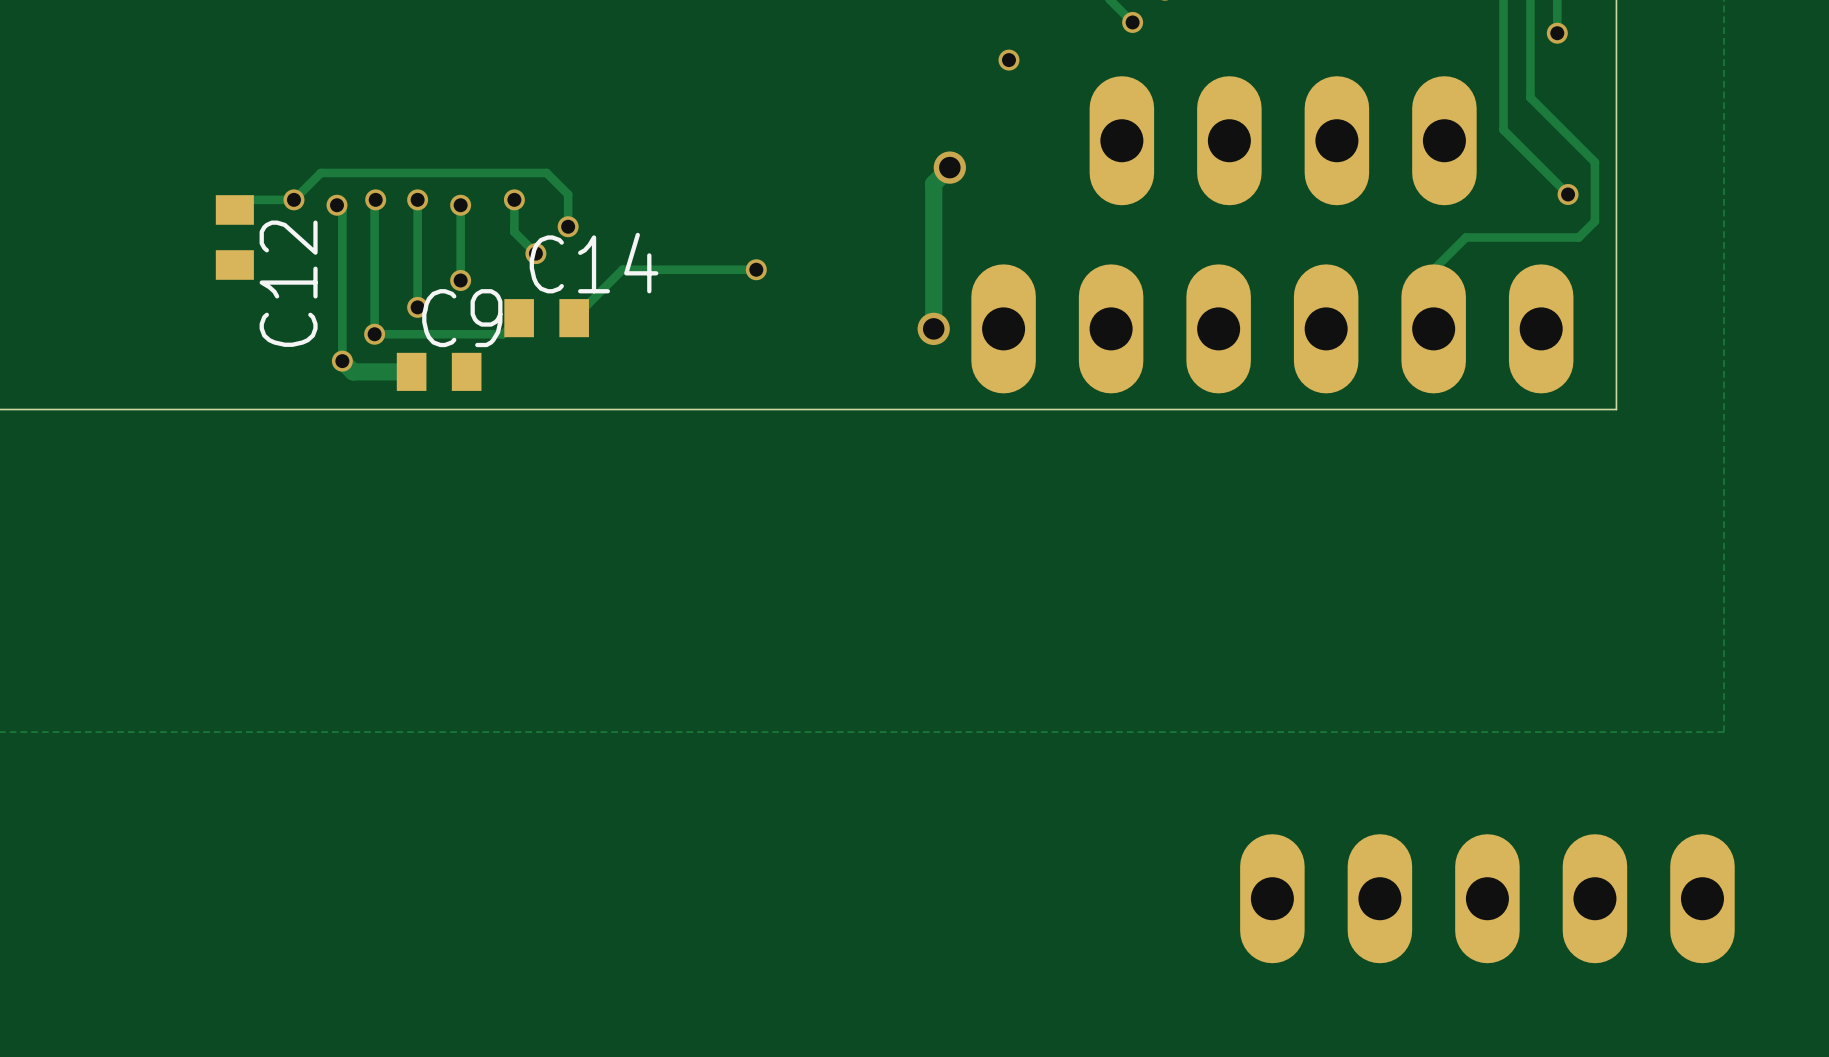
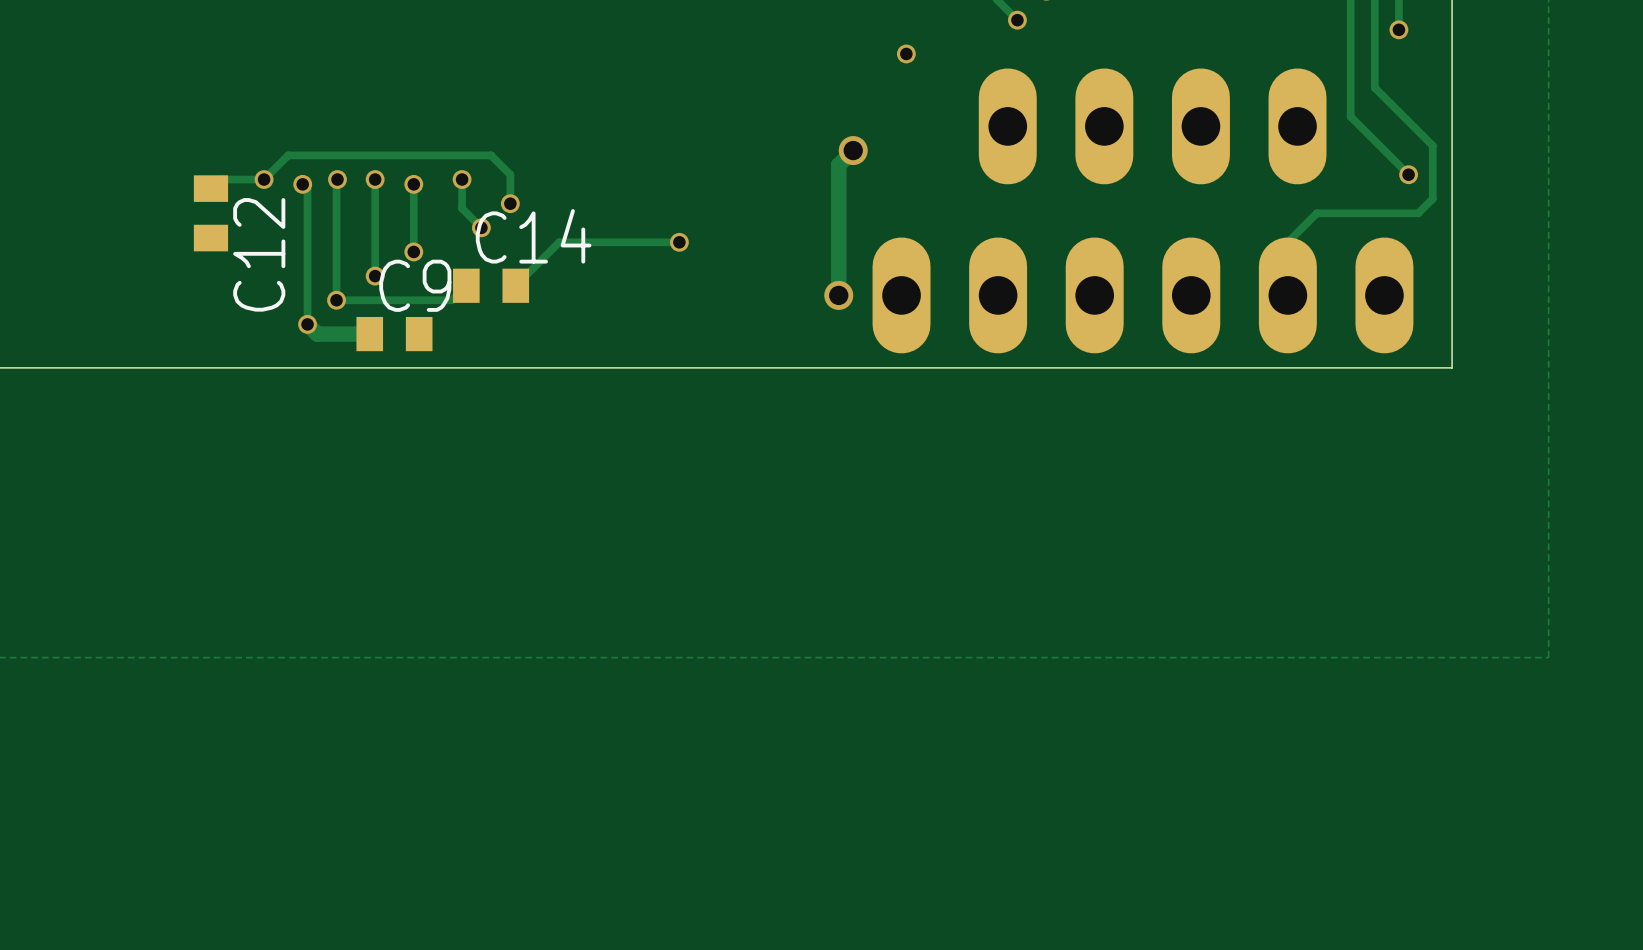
part: (1487, 898) -> none

